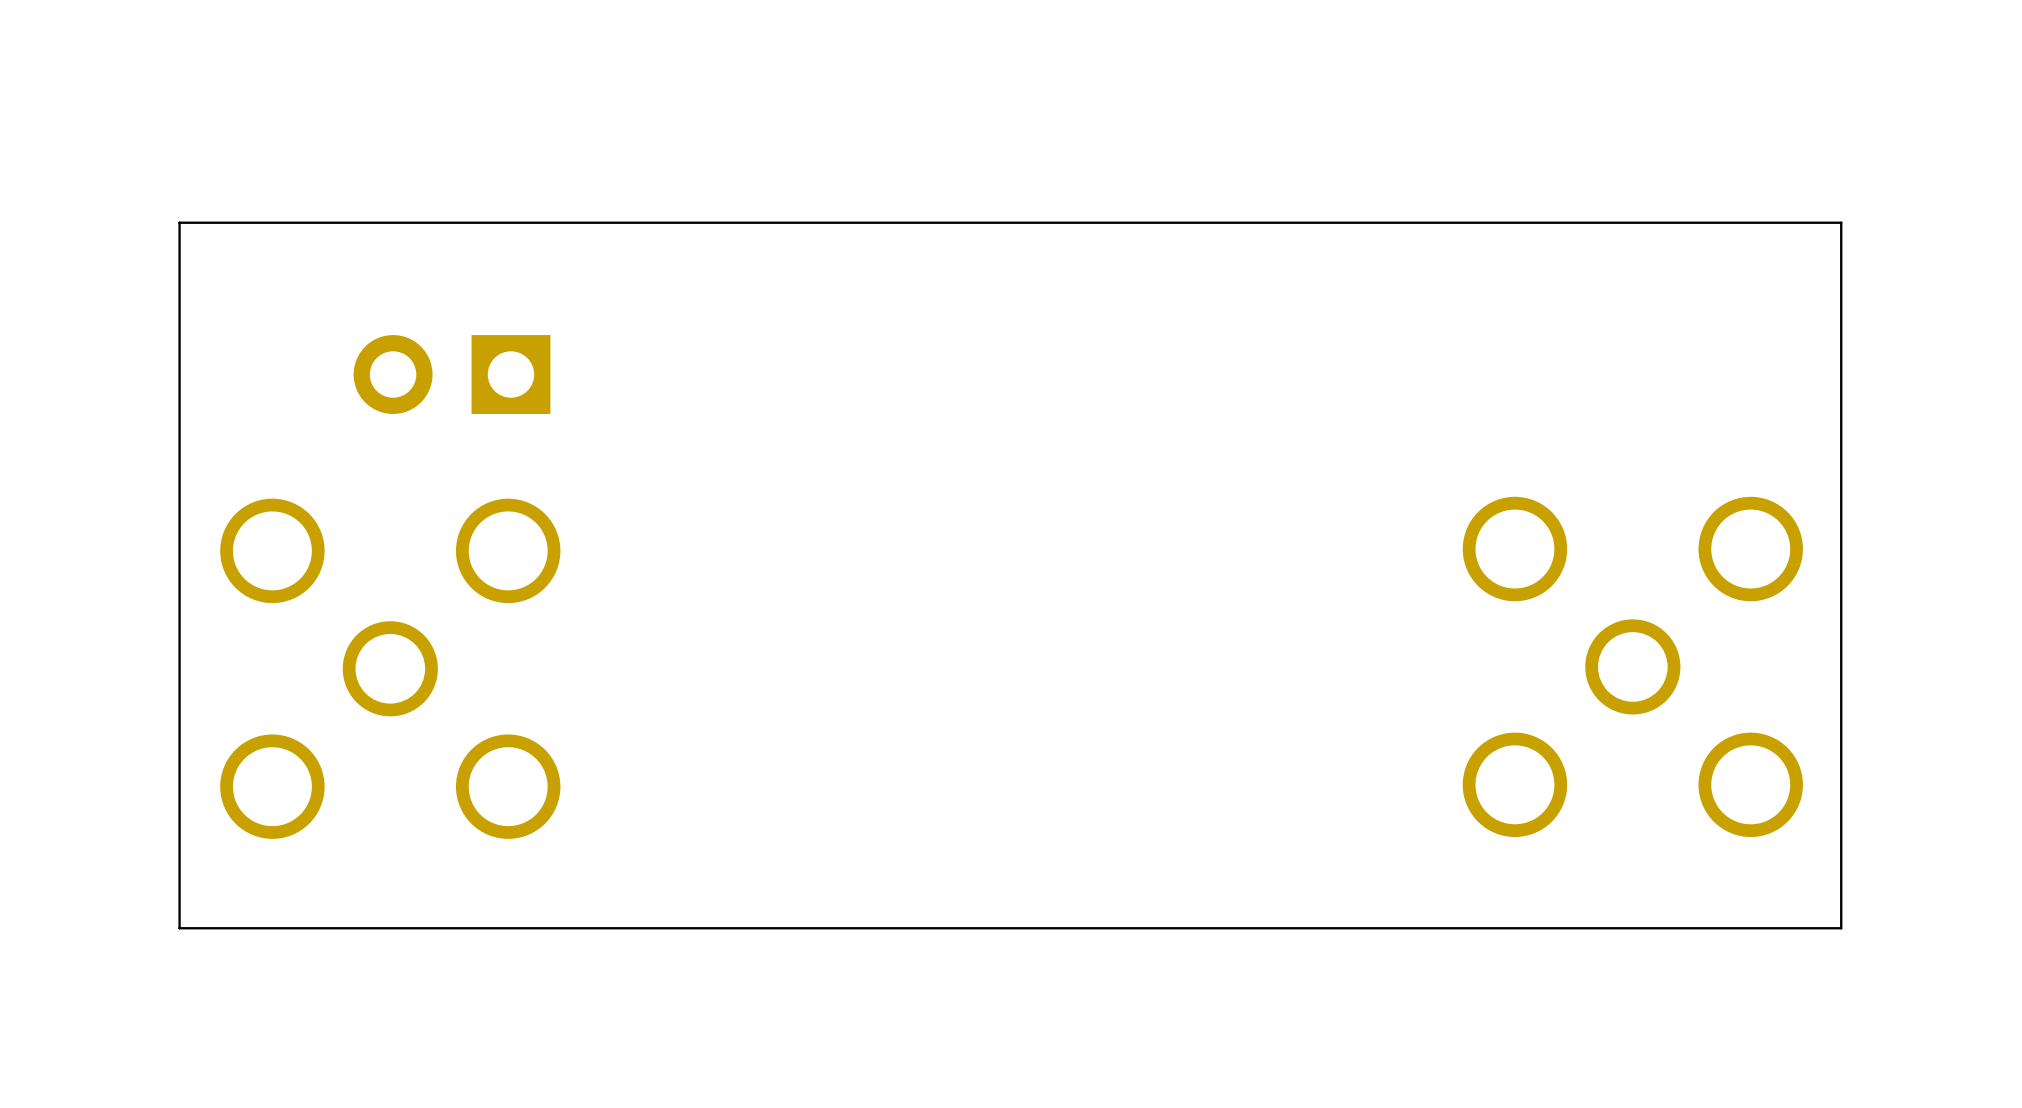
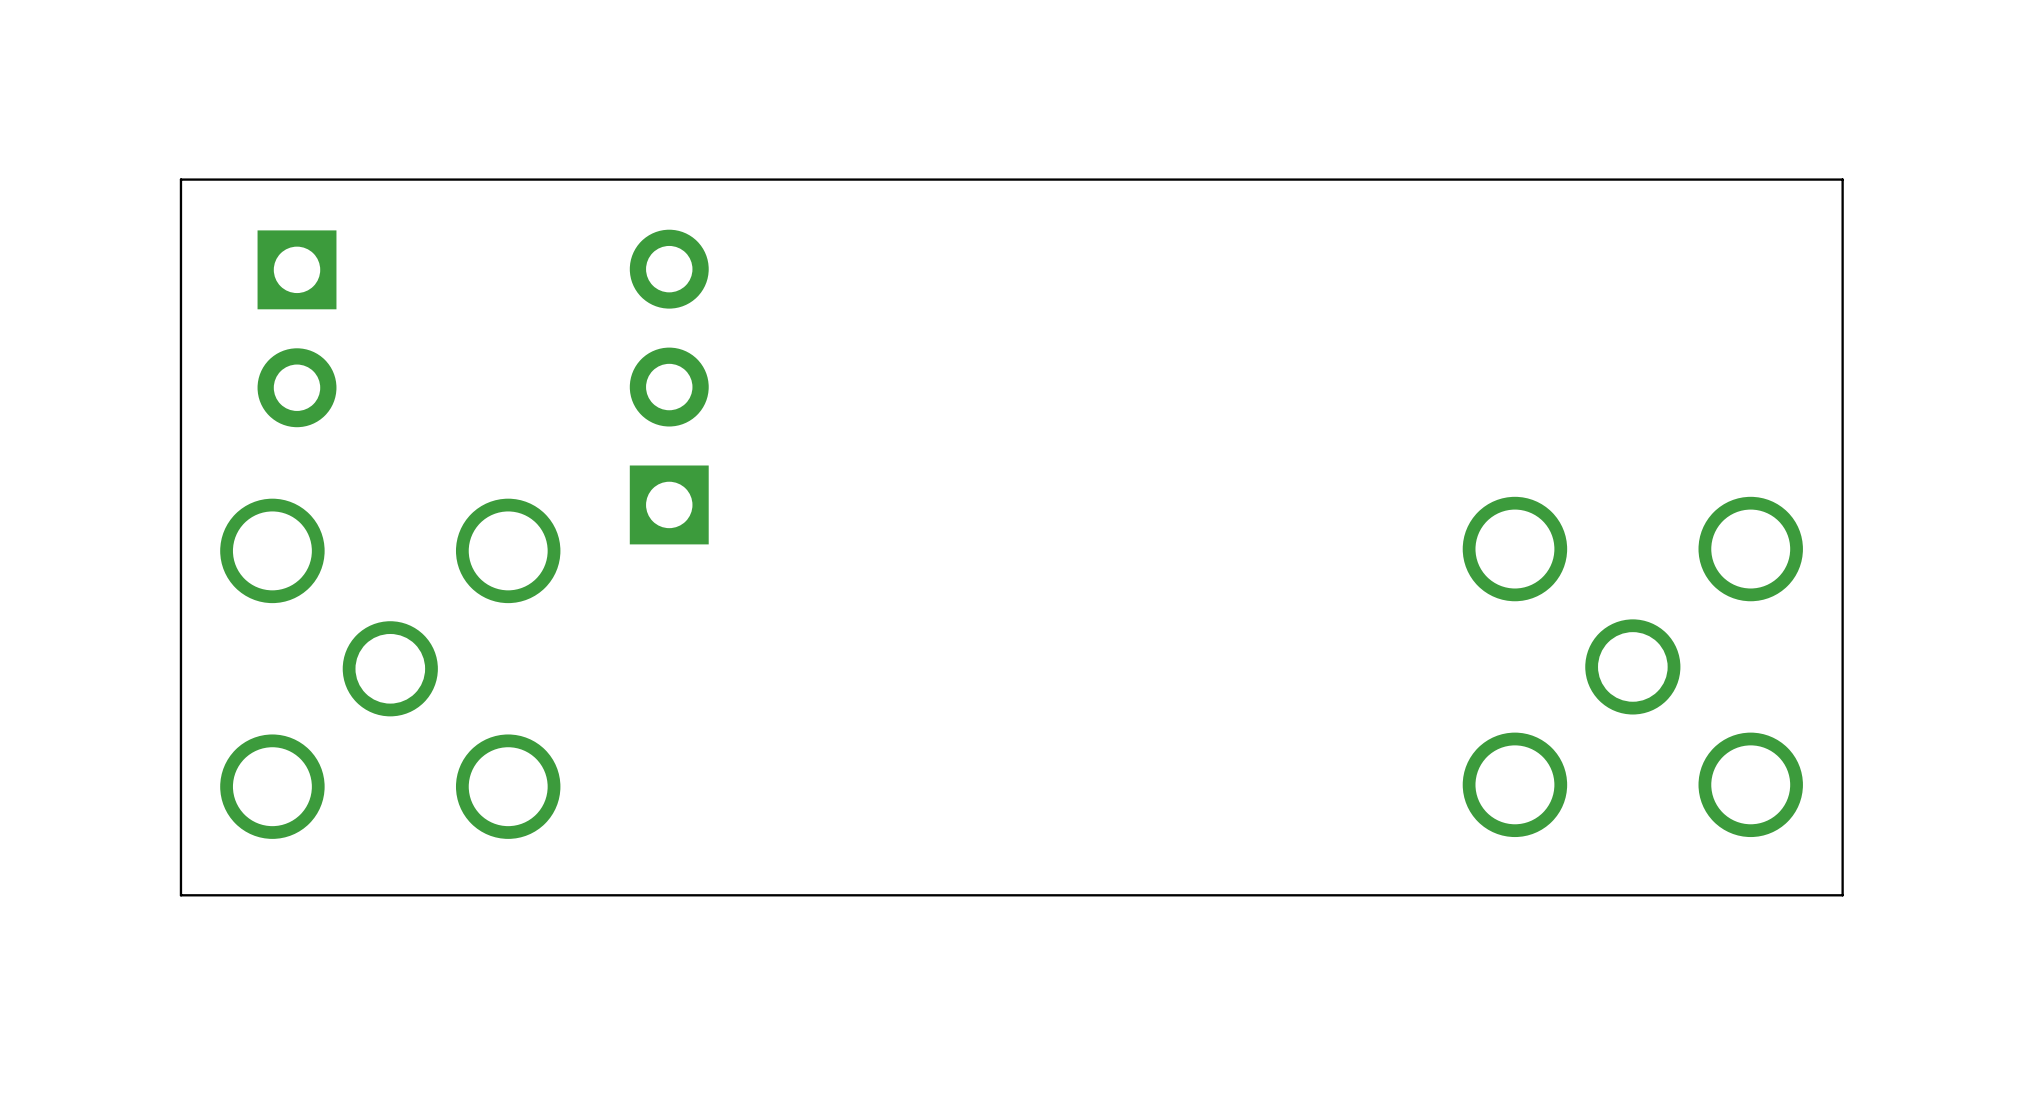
board edge: (1841, 222) (179, 222) (179, 928) (1841, 928) (1841, 222) -> (1842, 179) (1842, 895) (180, 895) (180, 179) (1842, 179)
part rotation: 0° (452, 374) -> 90° counterclockwise (297, 328)
part position: (452, 374) -> (297, 328)
part: none -> (669, 387)

